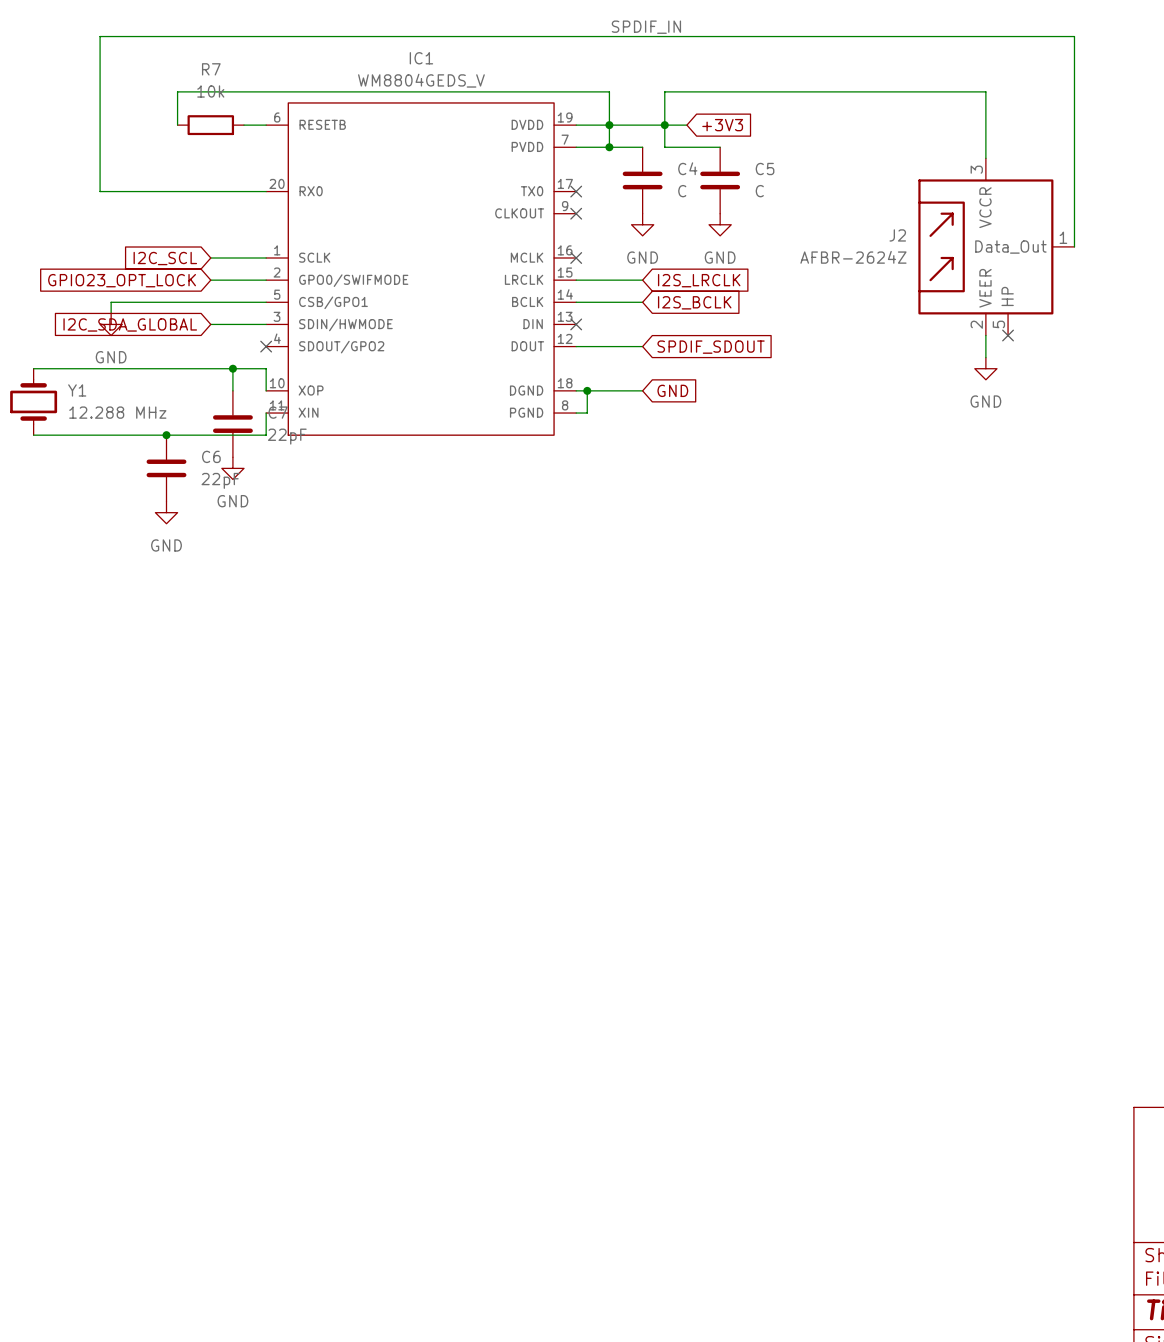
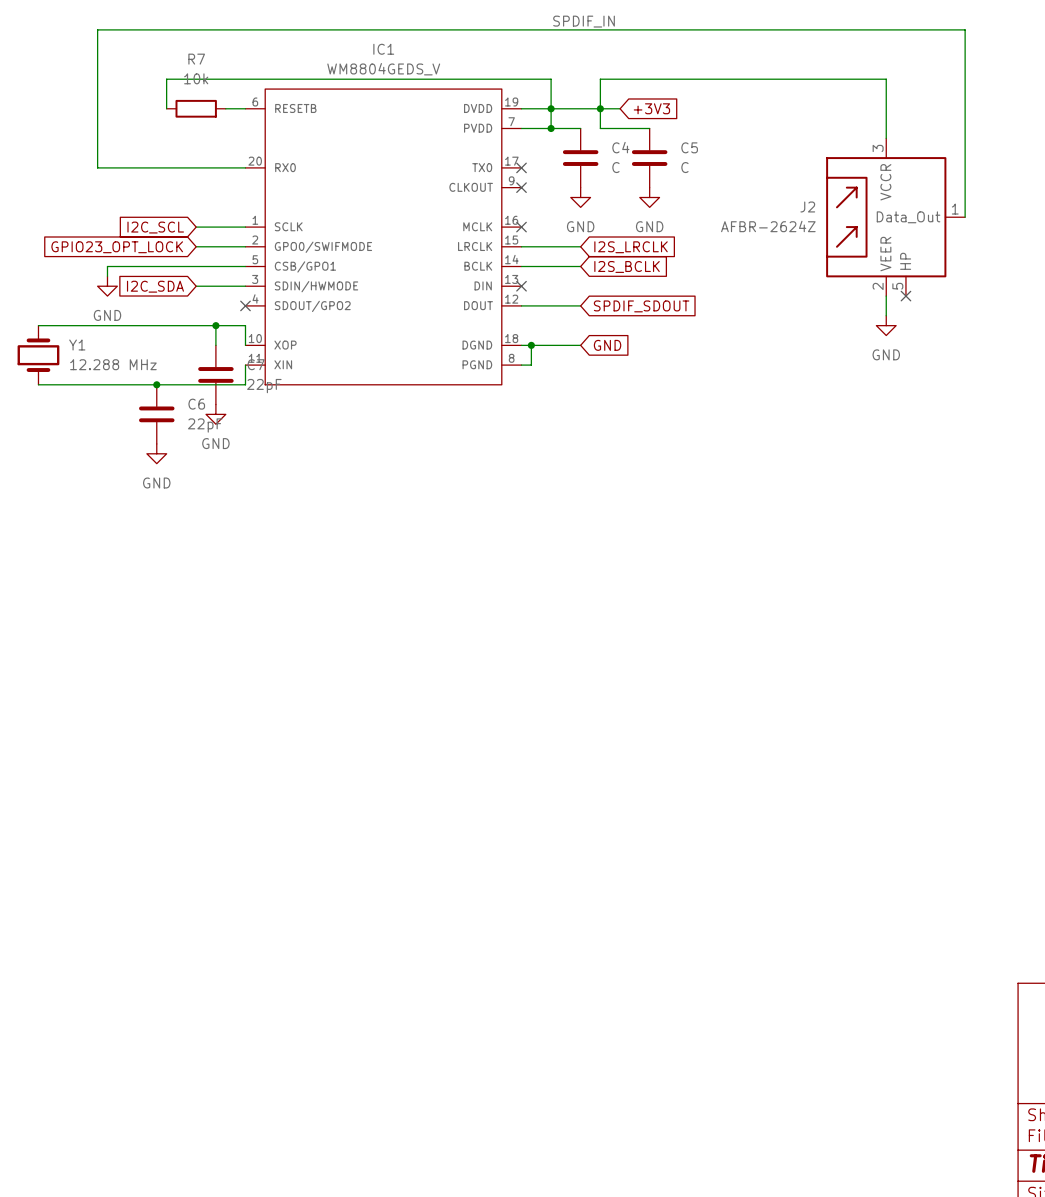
global label: I2C_SDA_GLOBAL (130, 324) -> I2C_SDA (155, 286)

